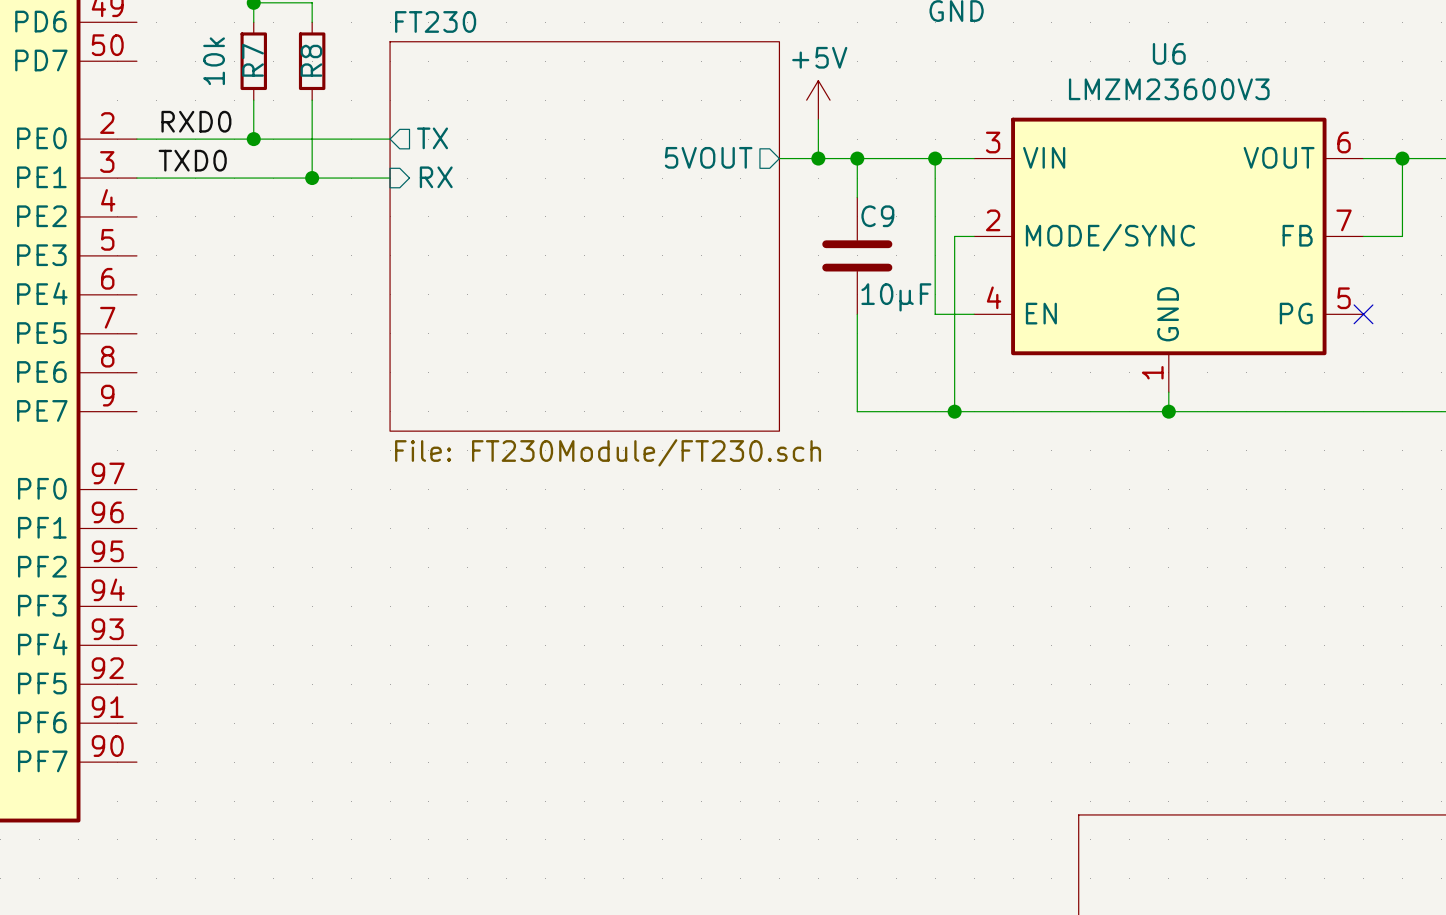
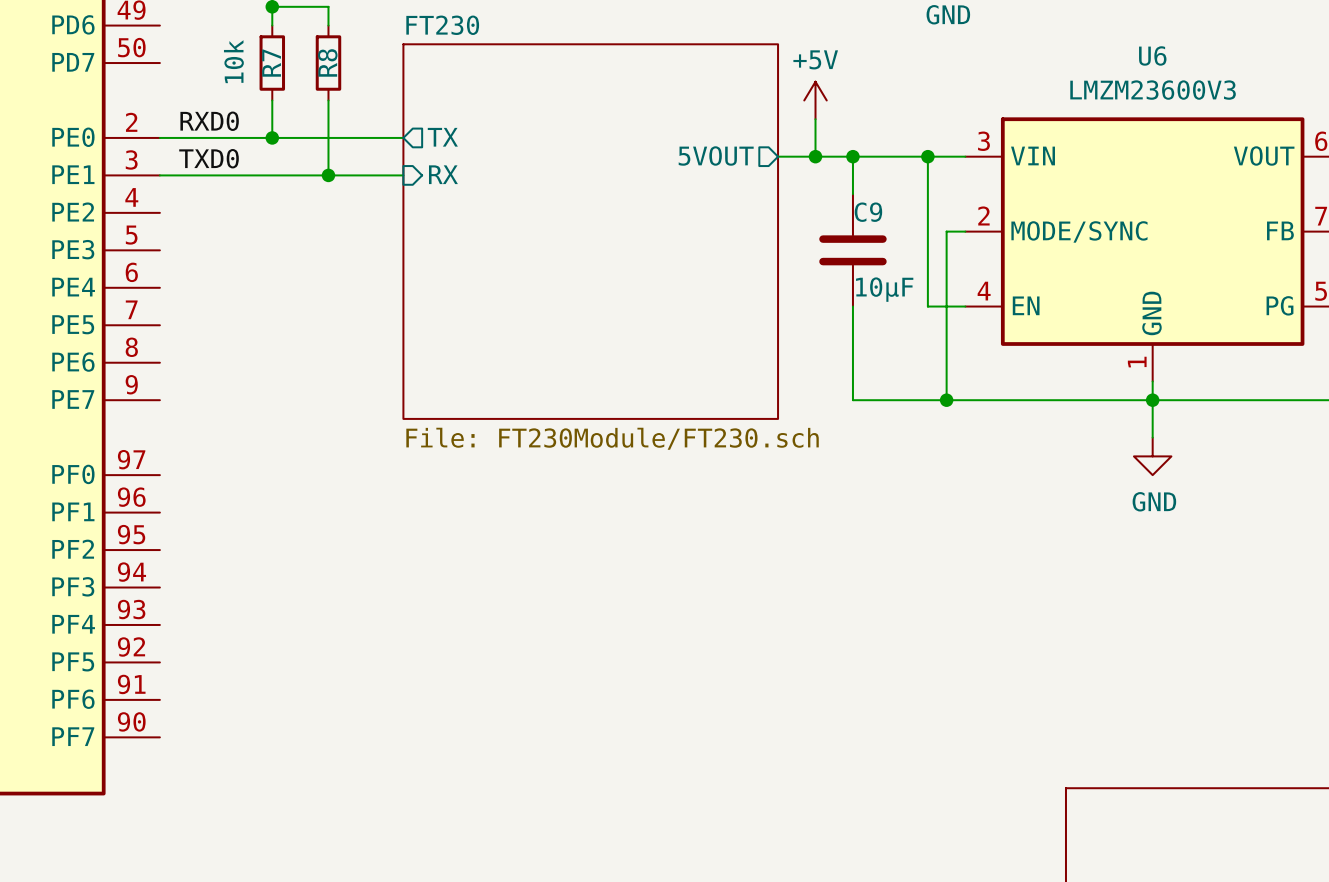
wire: none -> (1152, 400) (1152, 437)
power symbol: none -> GND (1152, 456)

